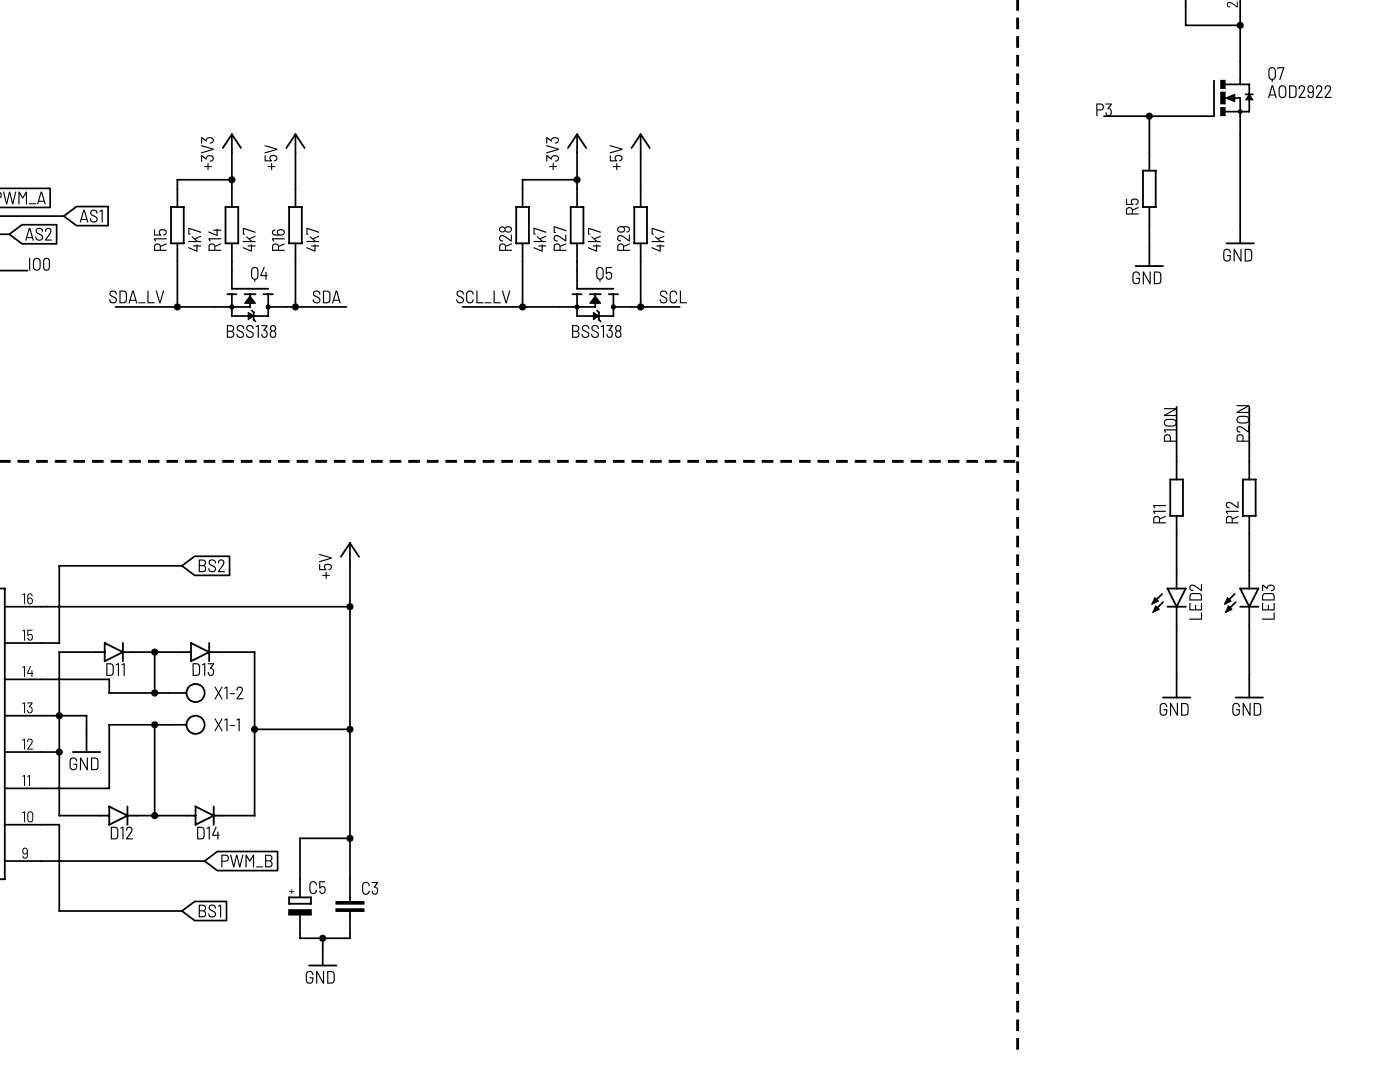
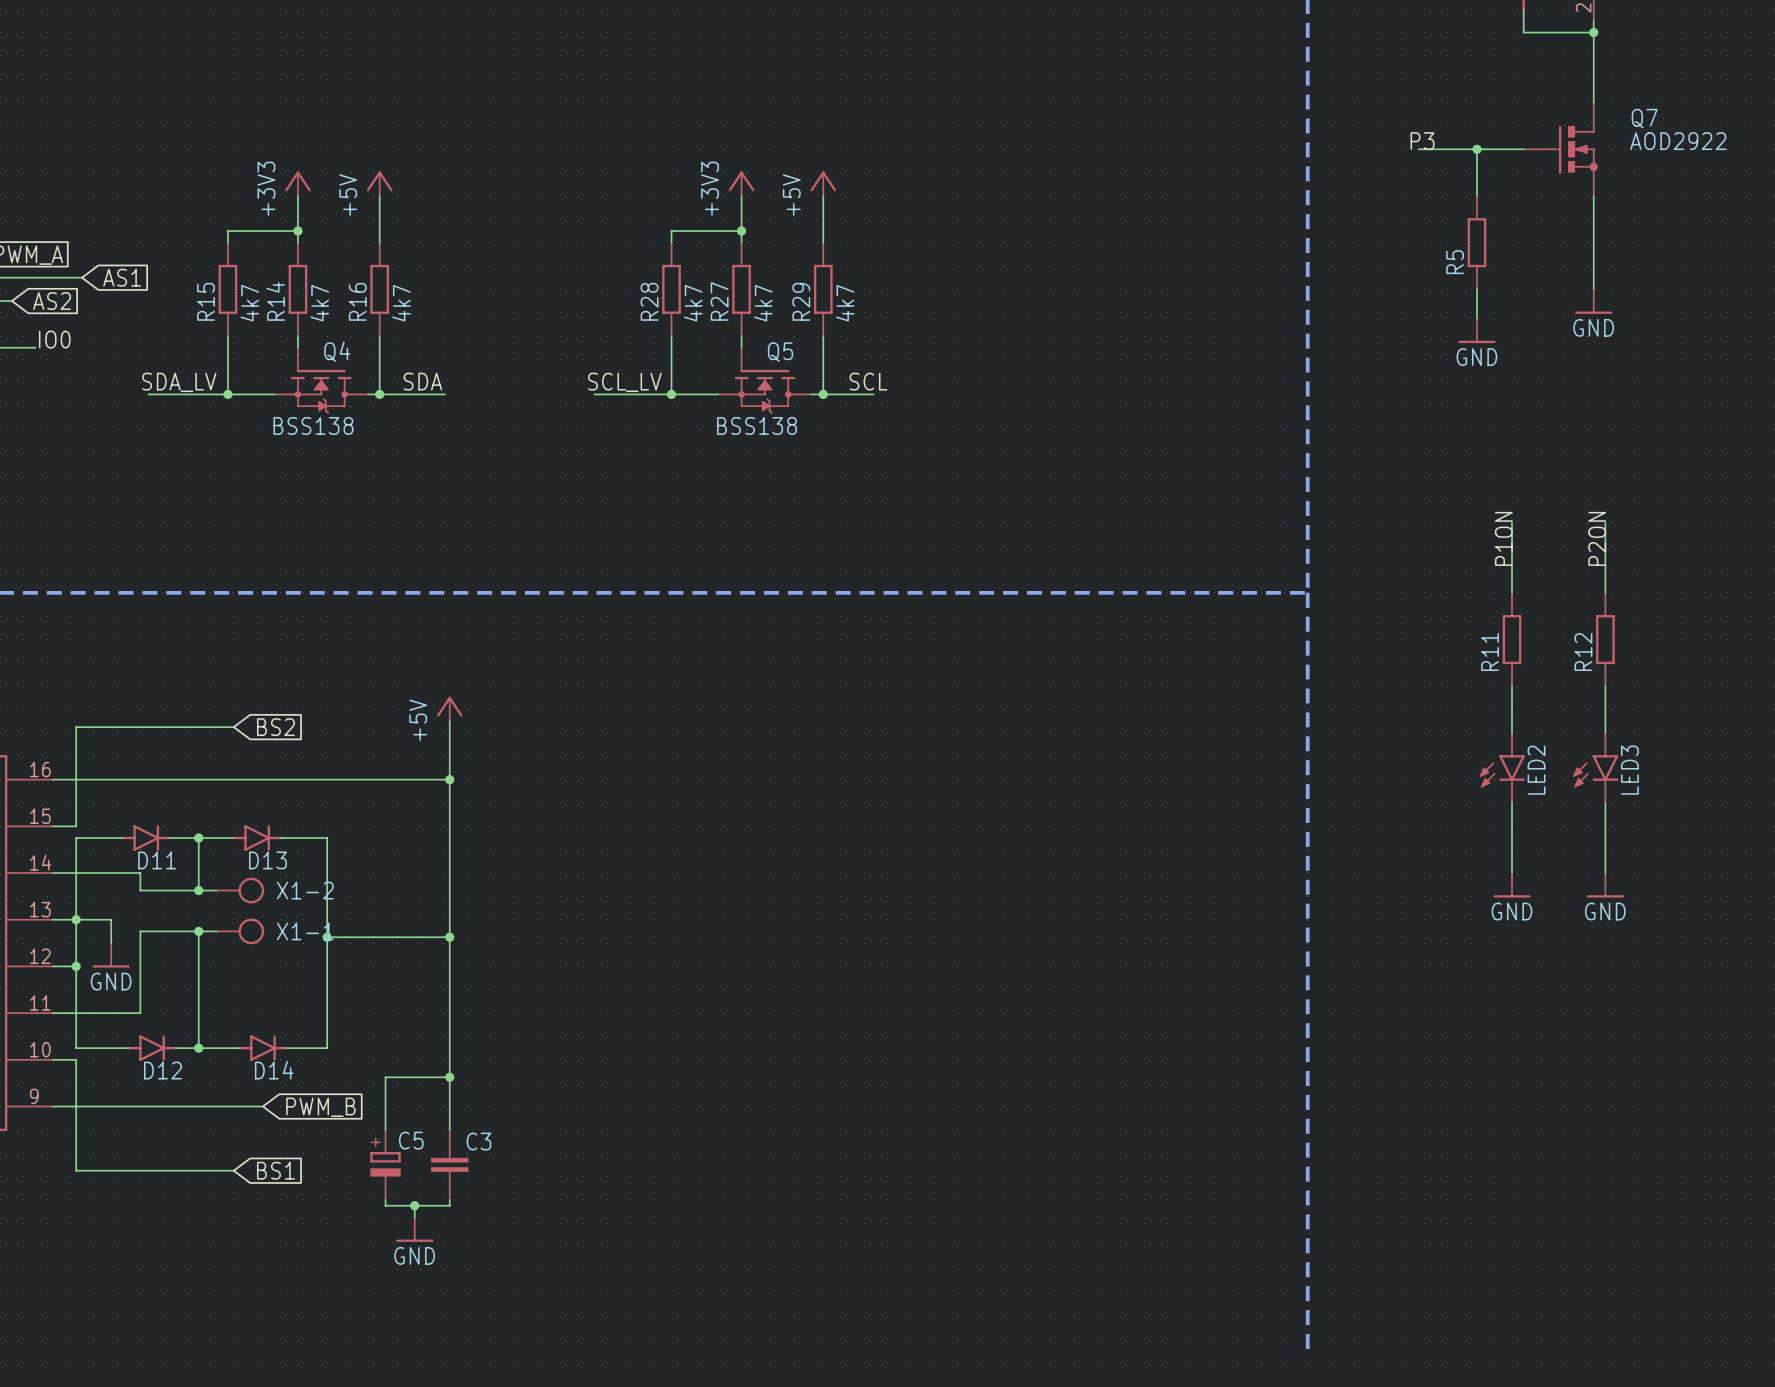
Q7 symbol: [1203, 61, 1254, 135] -> [1523, 102, 1598, 196]

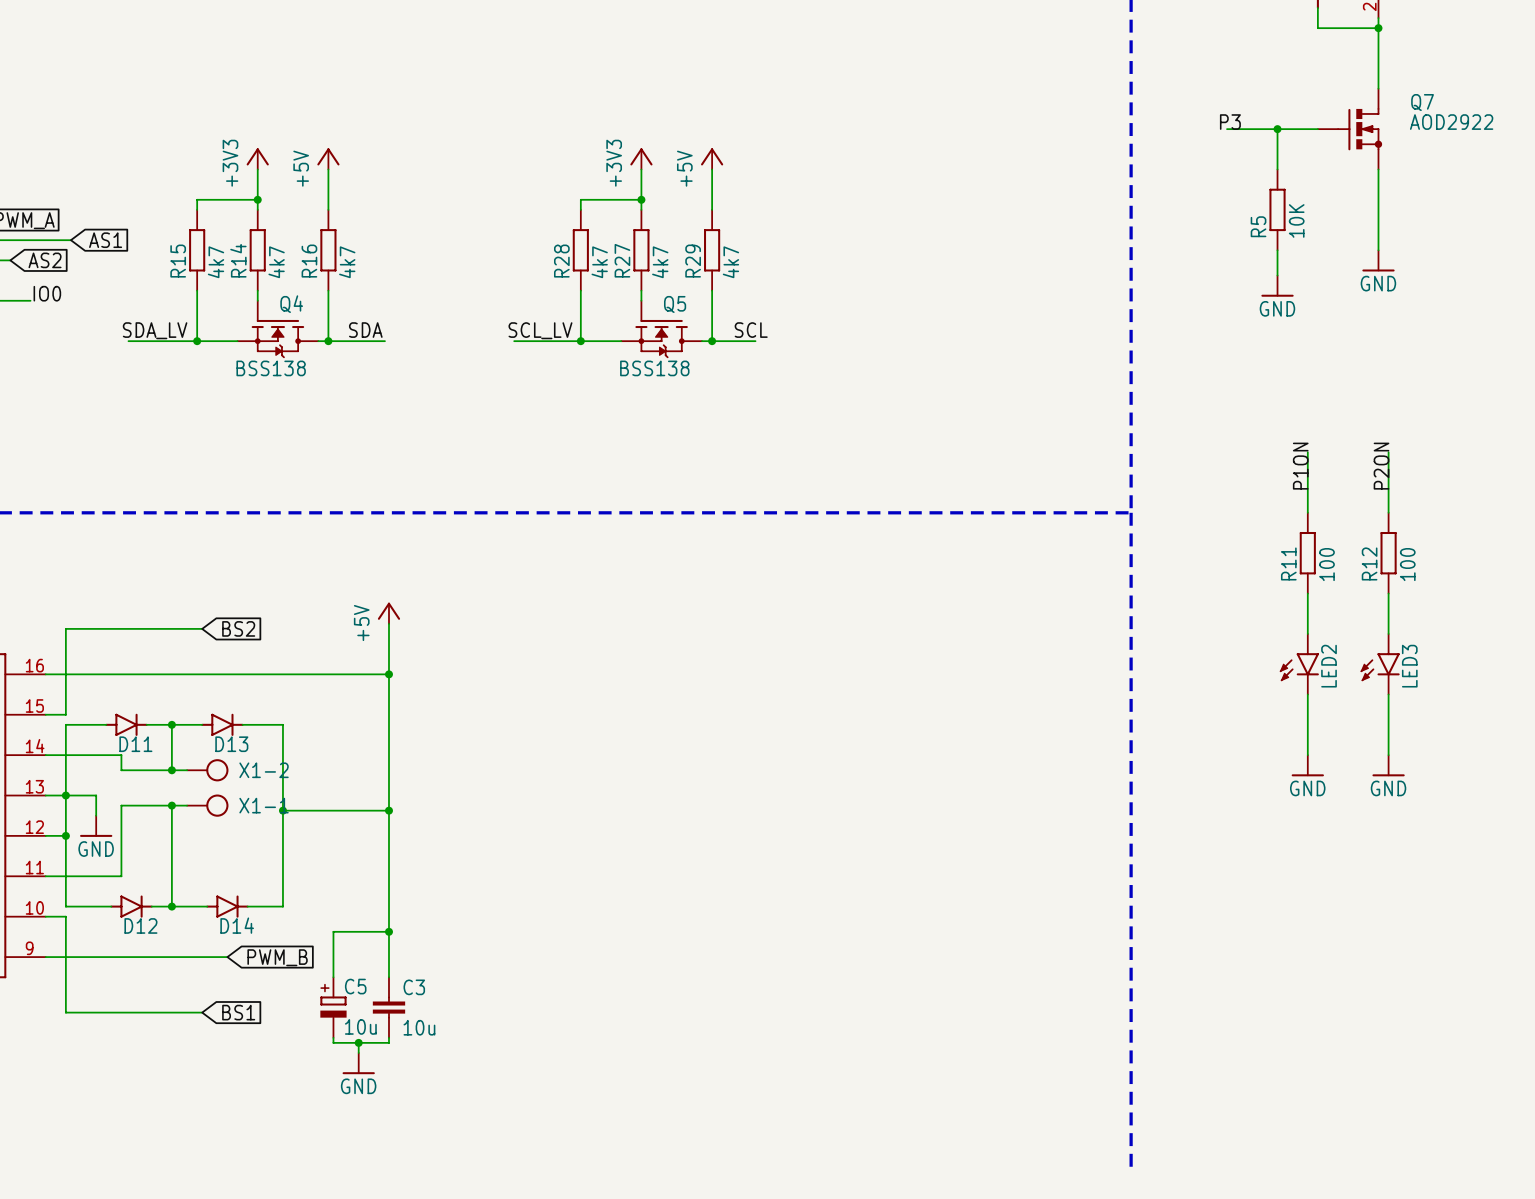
R5 value: none -> 10K (1296, 220)
R11 value: none -> 100 (1326, 564)
R12 value: none -> 100 (1407, 564)
C5 value: none -> 10u (360, 1026)
C3 value: none -> 10u (419, 1027)

